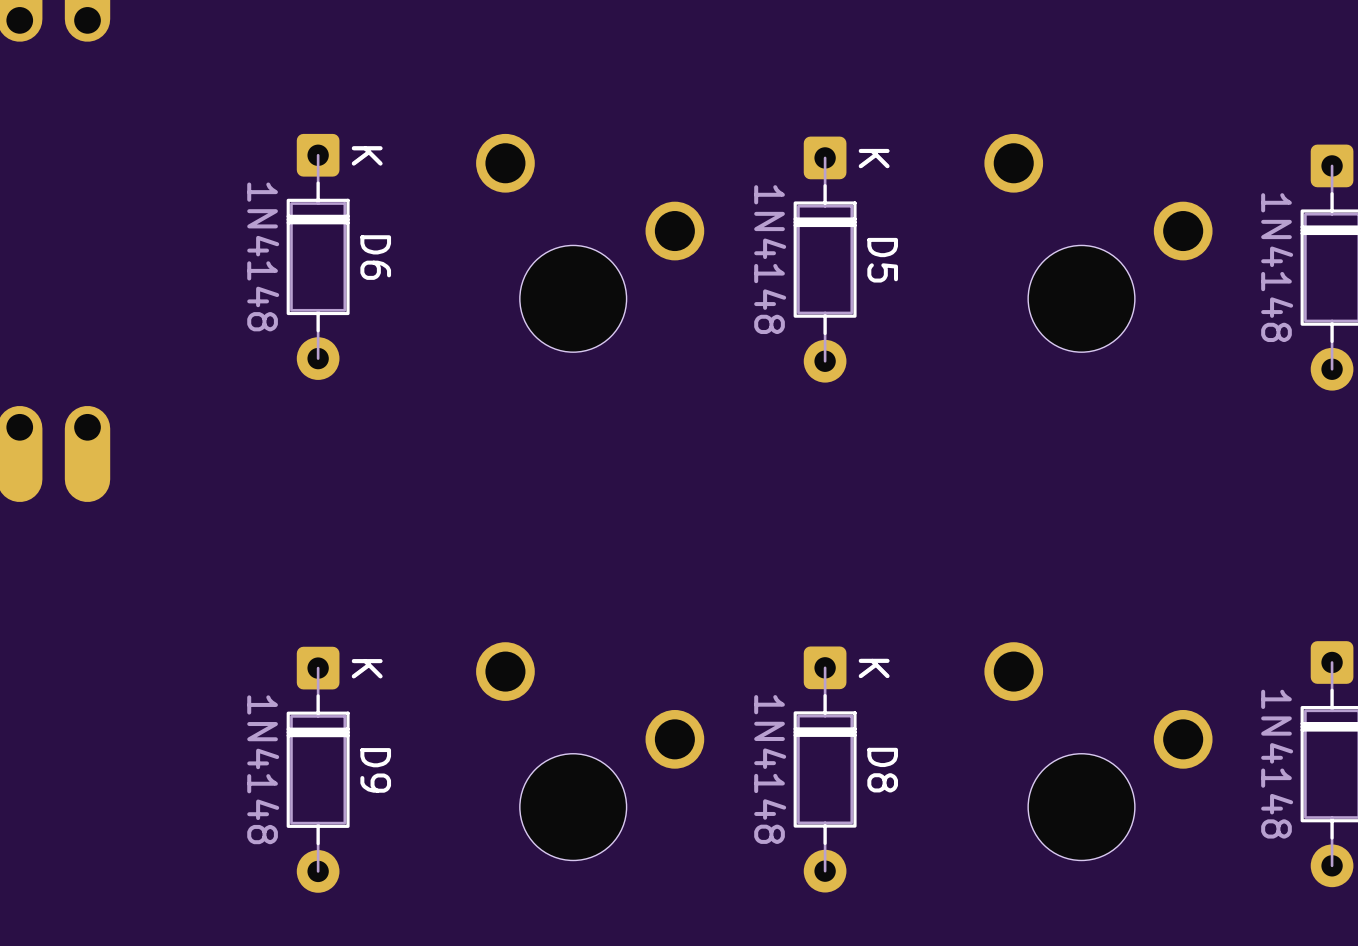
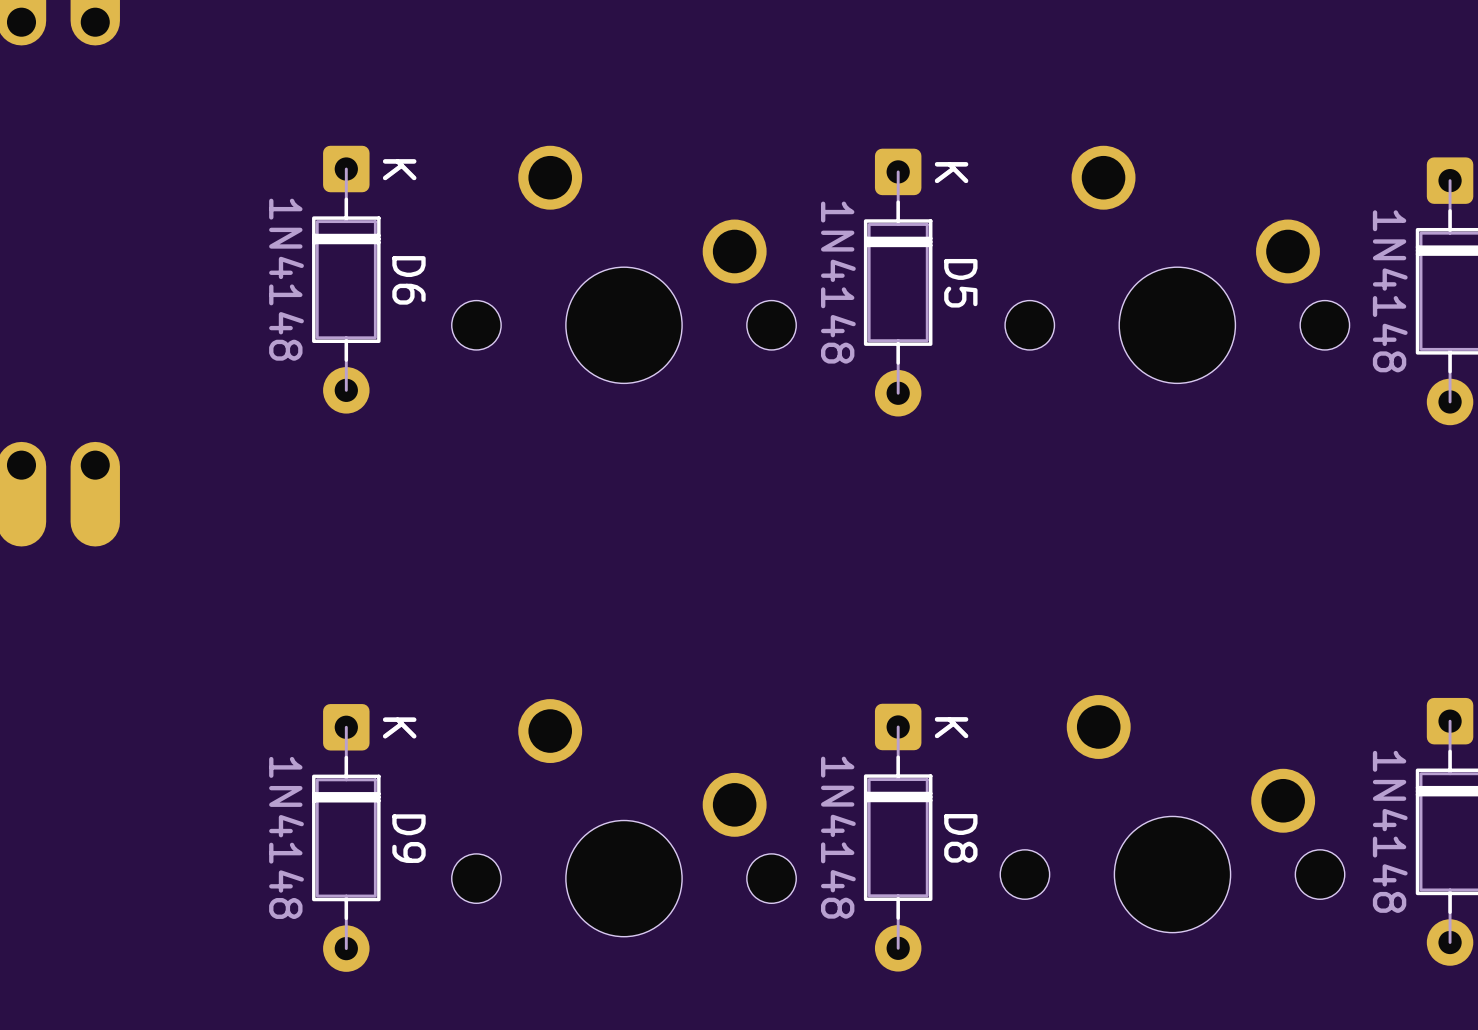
part footprint: [476, 133, 705, 353] -> [451, 145, 797, 384]
part footprint: [984, 133, 1213, 353] -> [1005, 145, 1350, 384]
part footprint: [476, 642, 705, 861] -> [451, 699, 797, 937]
part footprint: [984, 642, 1213, 861] -> [1000, 695, 1345, 933]

